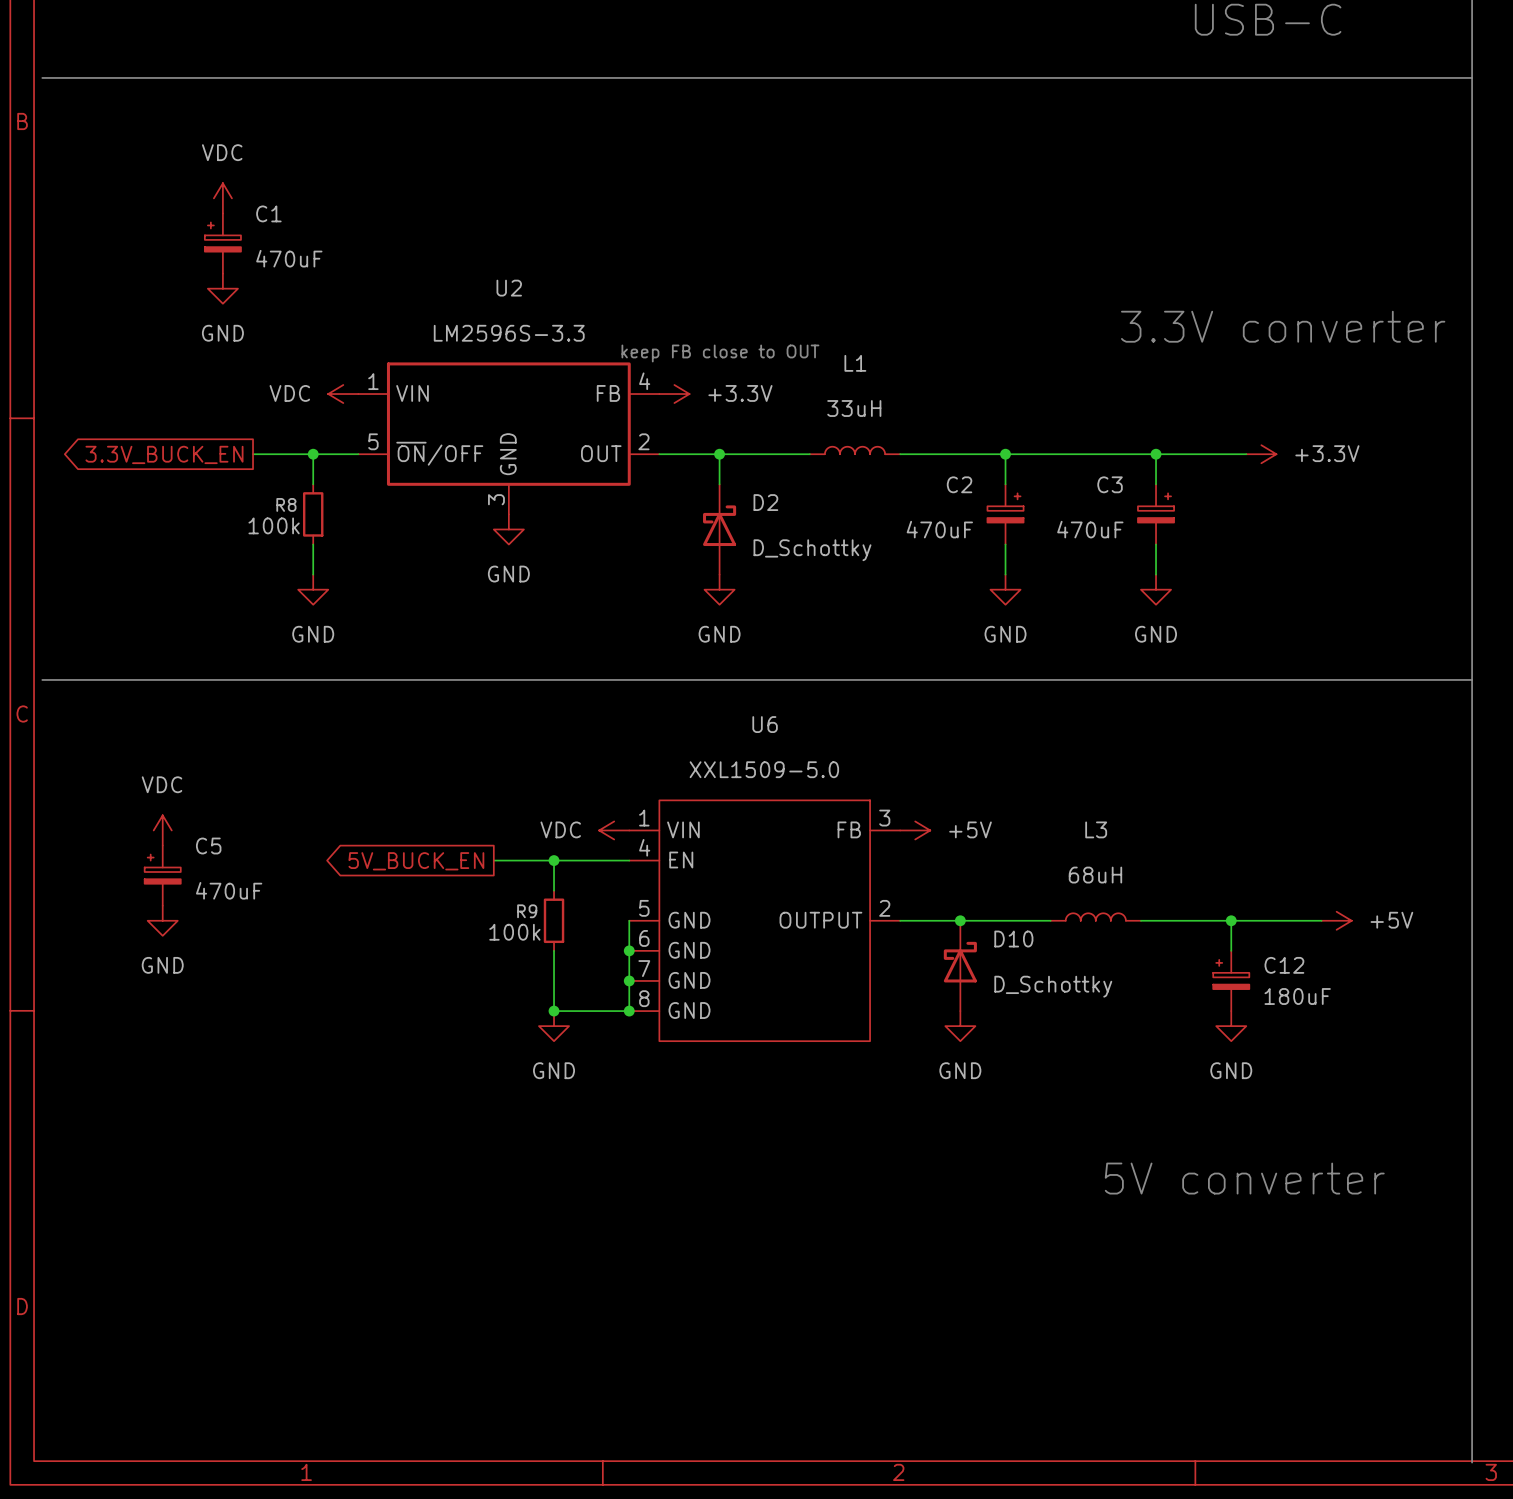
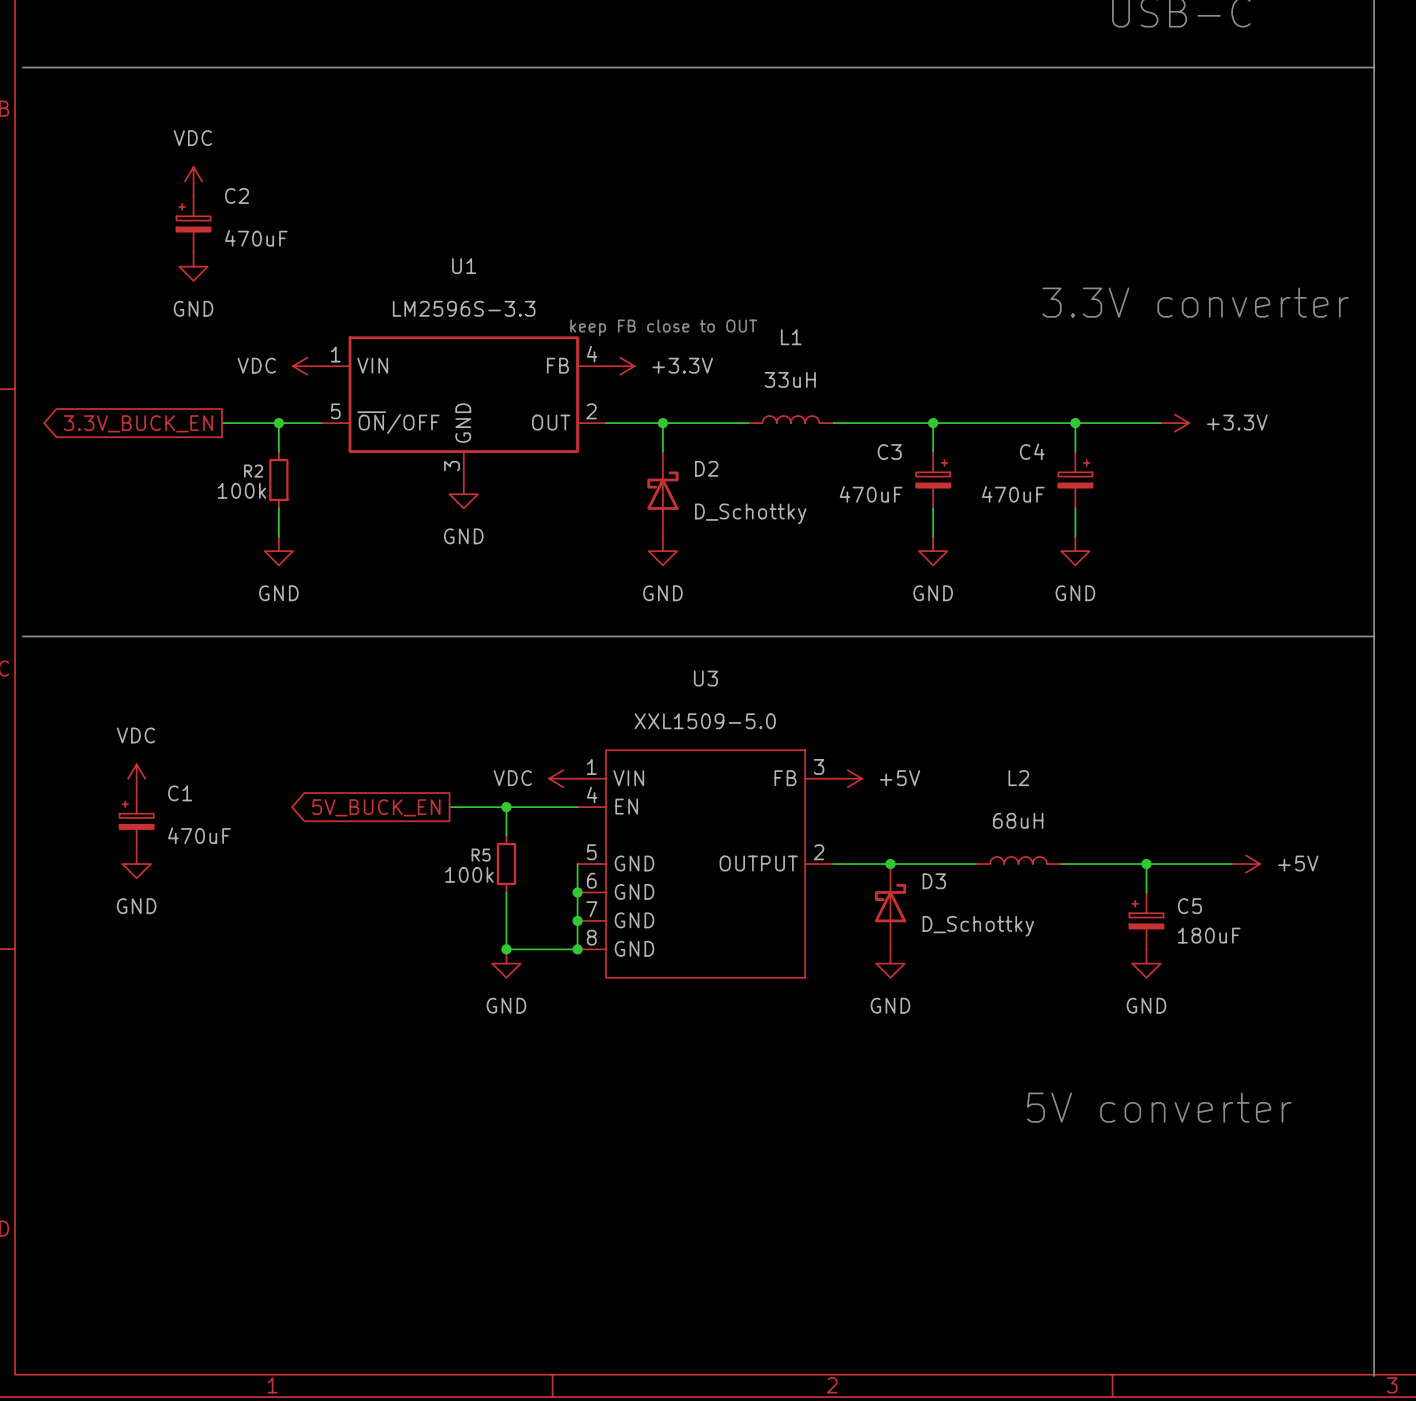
C1 name: C1 (268, 213) -> C2 (237, 196)
U2 name: U2 (509, 288) -> U1 (464, 266)
C2 name: C2 (959, 484) -> C3 (889, 452)
C3 name: C3 (1110, 484) -> C4 (1032, 451)
R8 name: R8 (286, 504) -> R2 (253, 471)
U6 name: U6 (765, 724) -> U3 (705, 678)
L3 name: L3 (1096, 829) -> L2 (1018, 778)
C5 name: C5 (208, 846) -> C1 (180, 793)
R9 name: R9 (527, 911) -> R5 (481, 855)
D10 name: D10 (1013, 939) -> D3 (934, 881)
C12 name: C12 (1284, 965) -> C5 (1189, 906)

